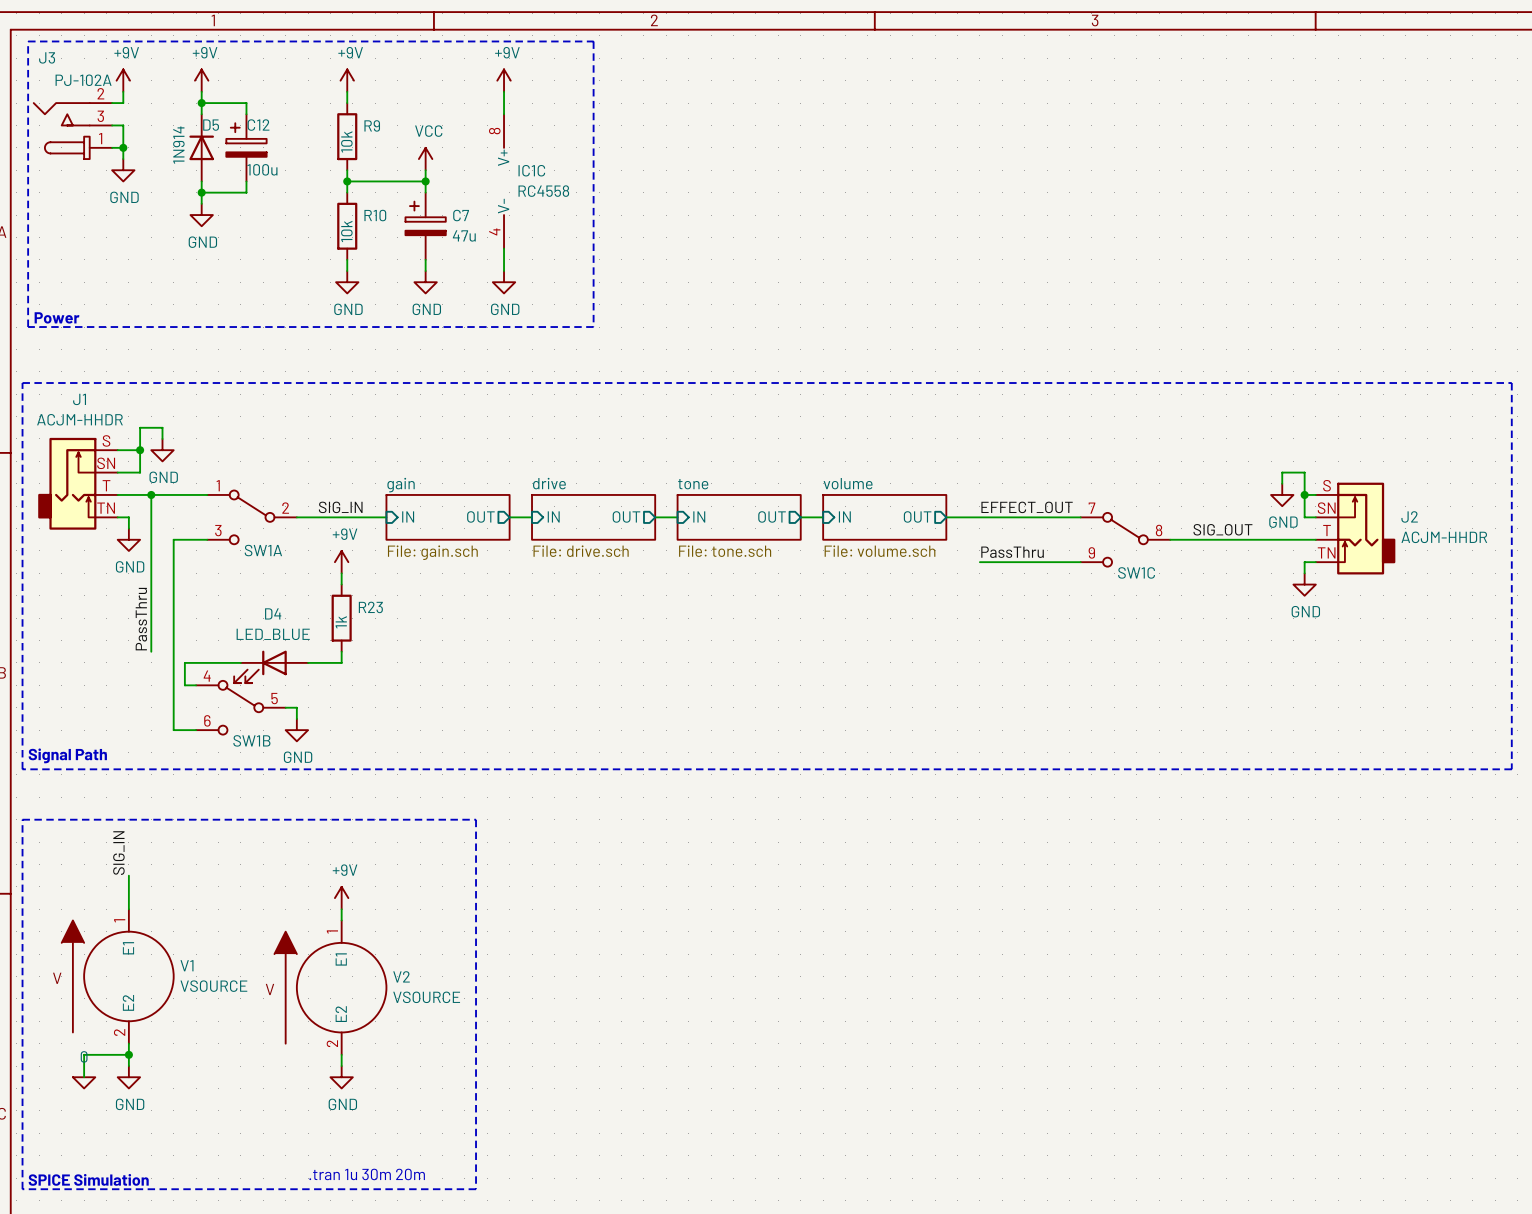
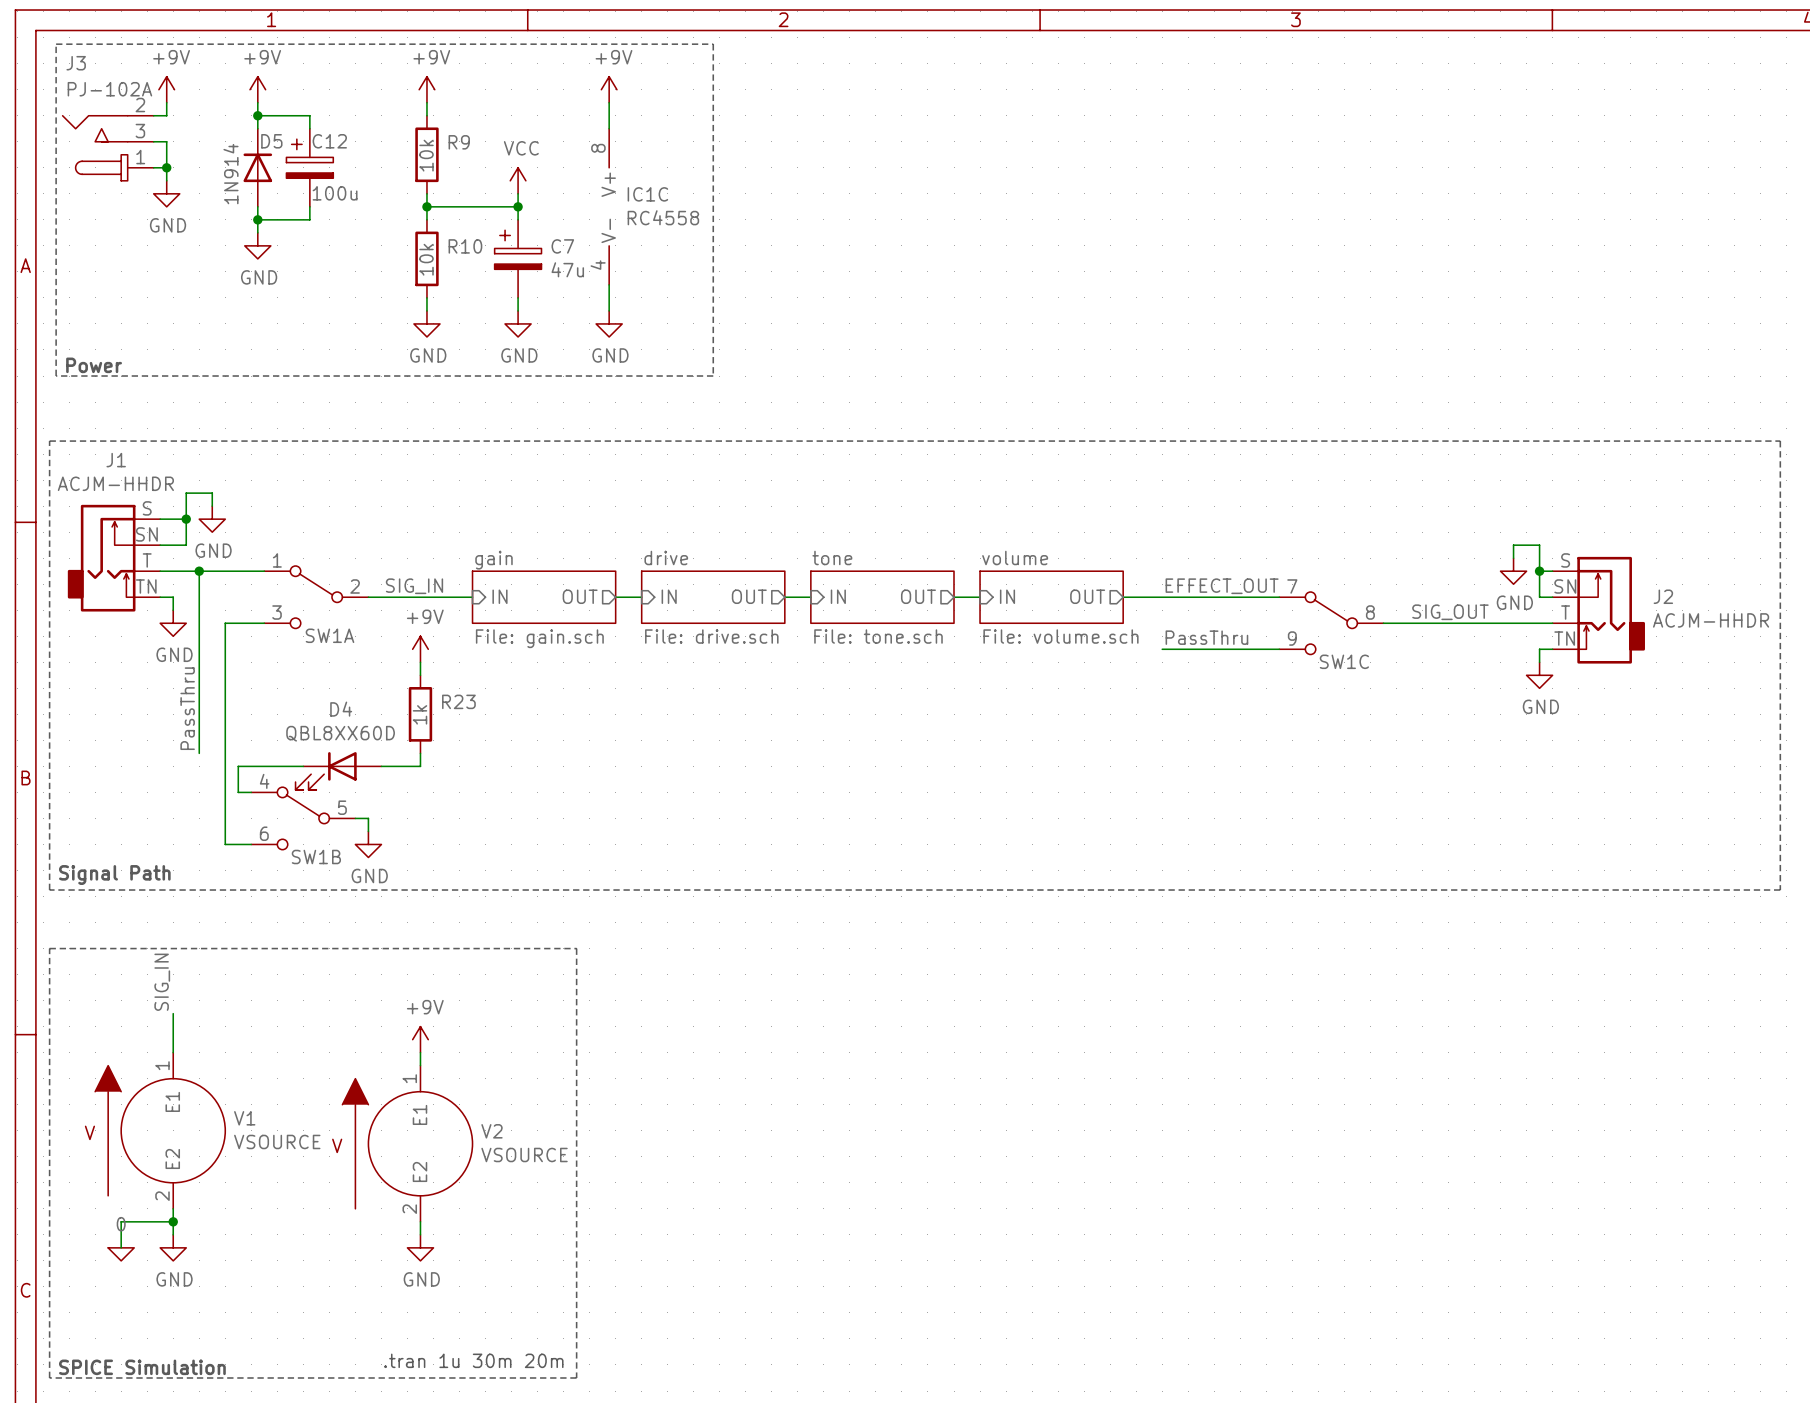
D4 value: LED_BLUE (273, 634) -> QBL8XX60D (340, 733)

